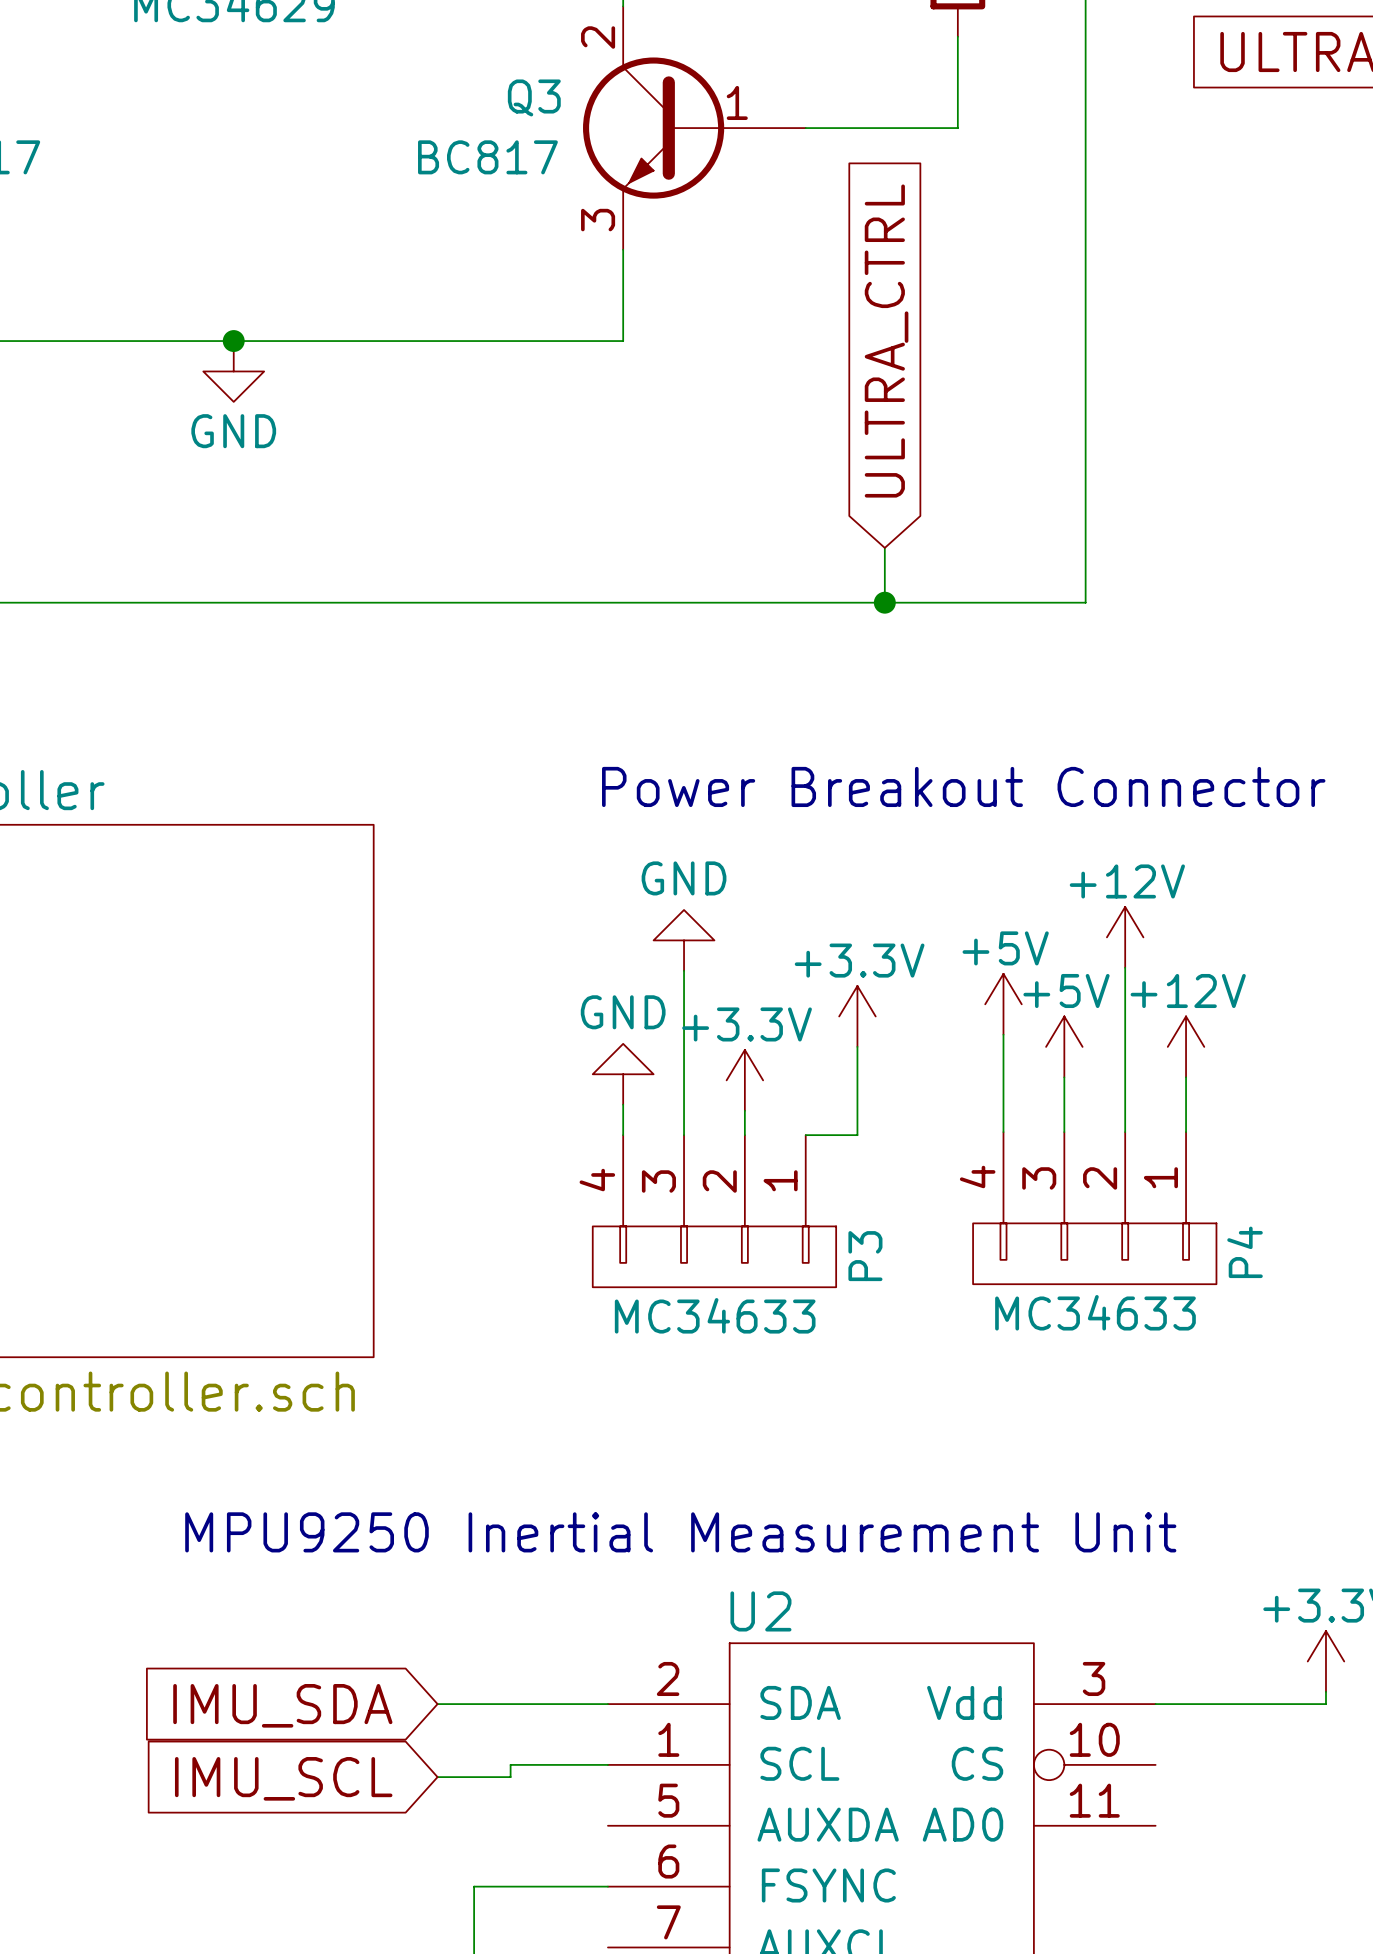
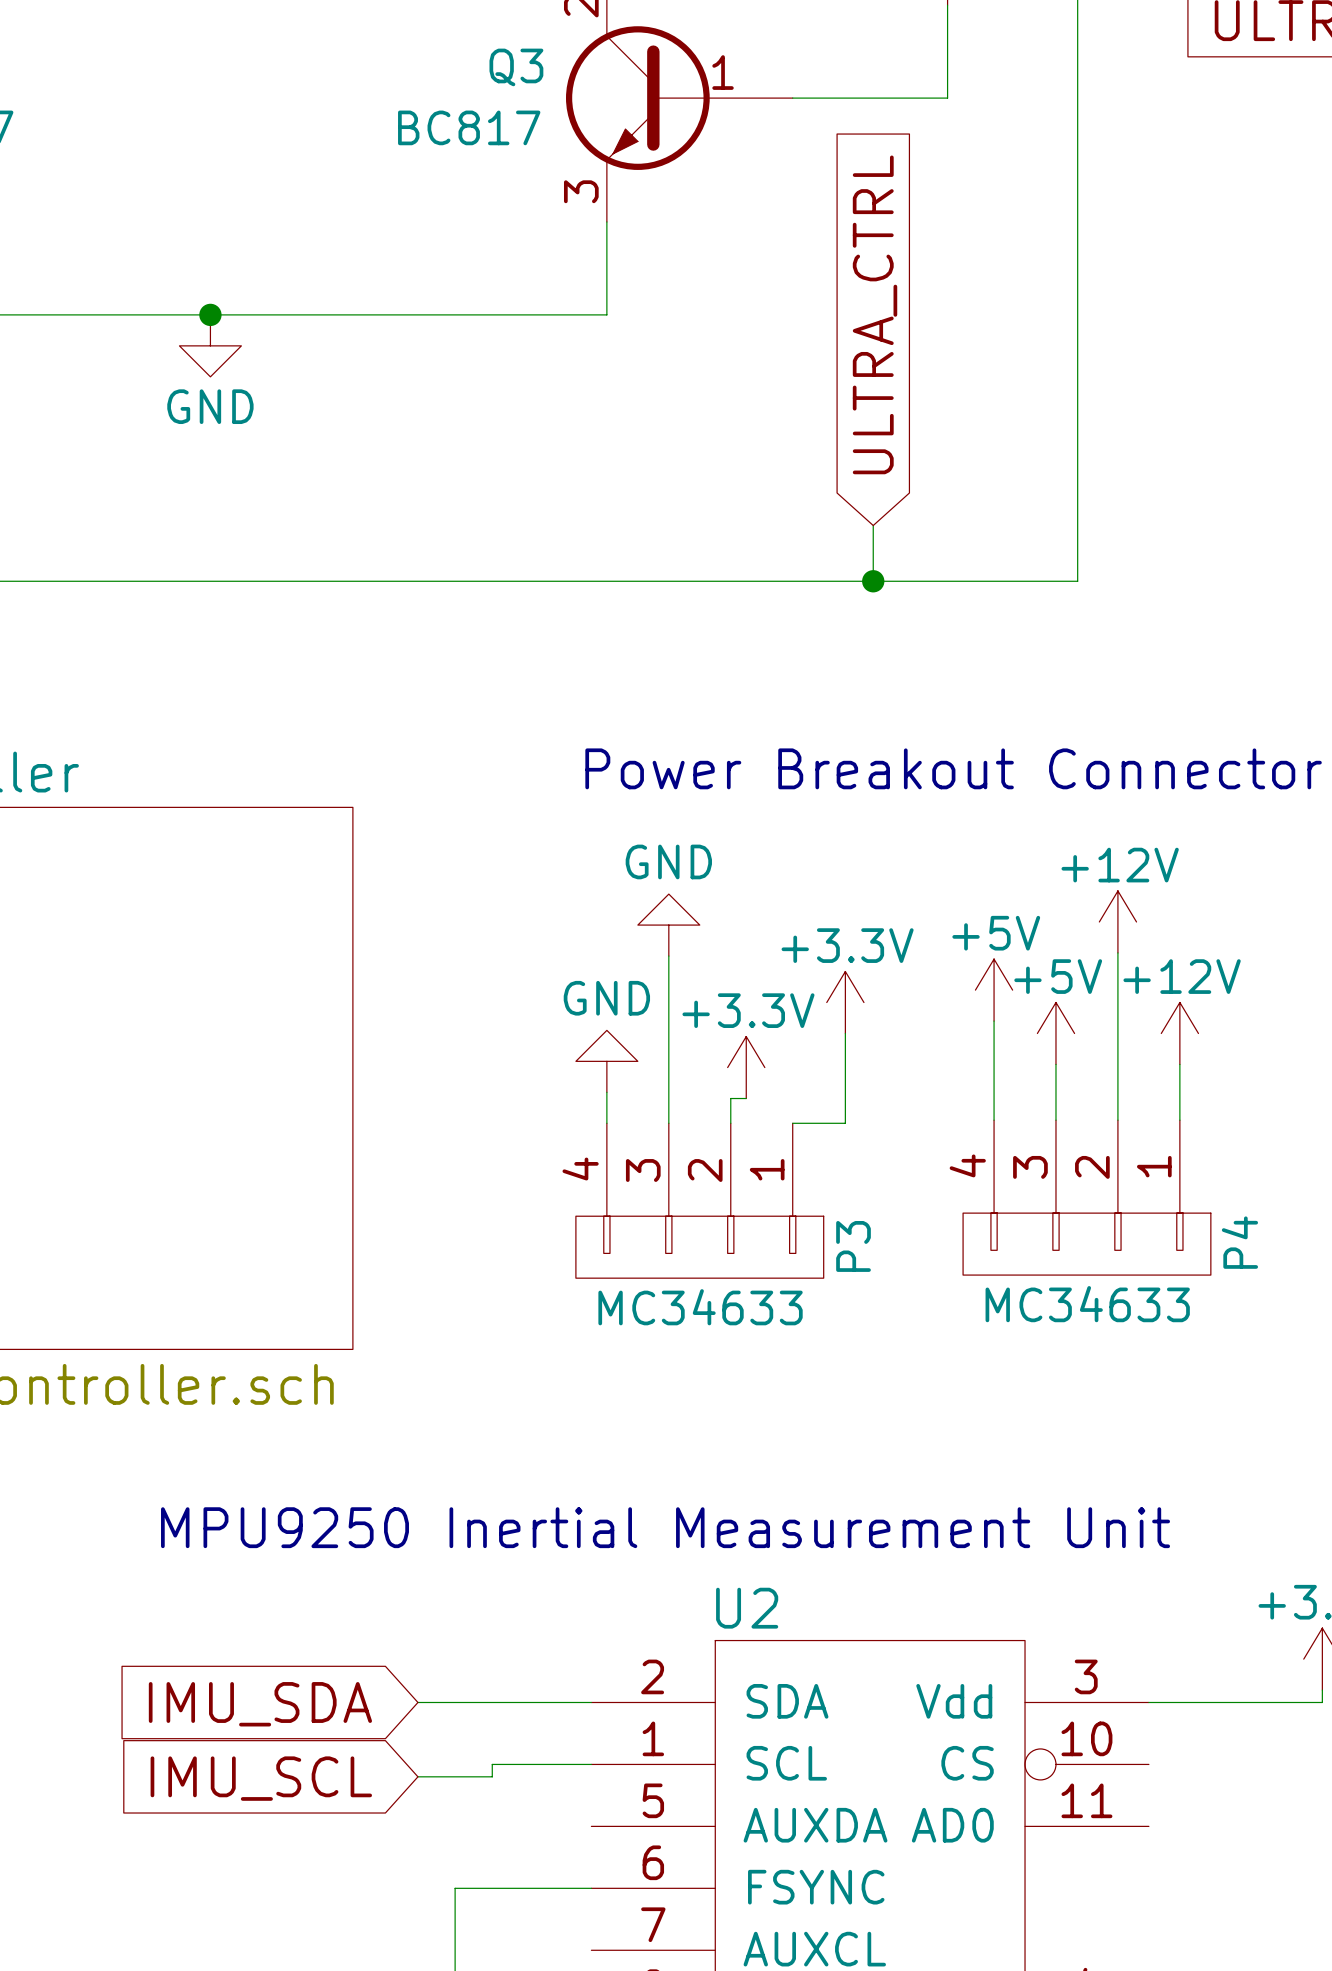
power symbol position: +3.3V (744, 1080) -> +3.3V (746, 1067)
wire: none -> (730, 1098) (746, 1098)

